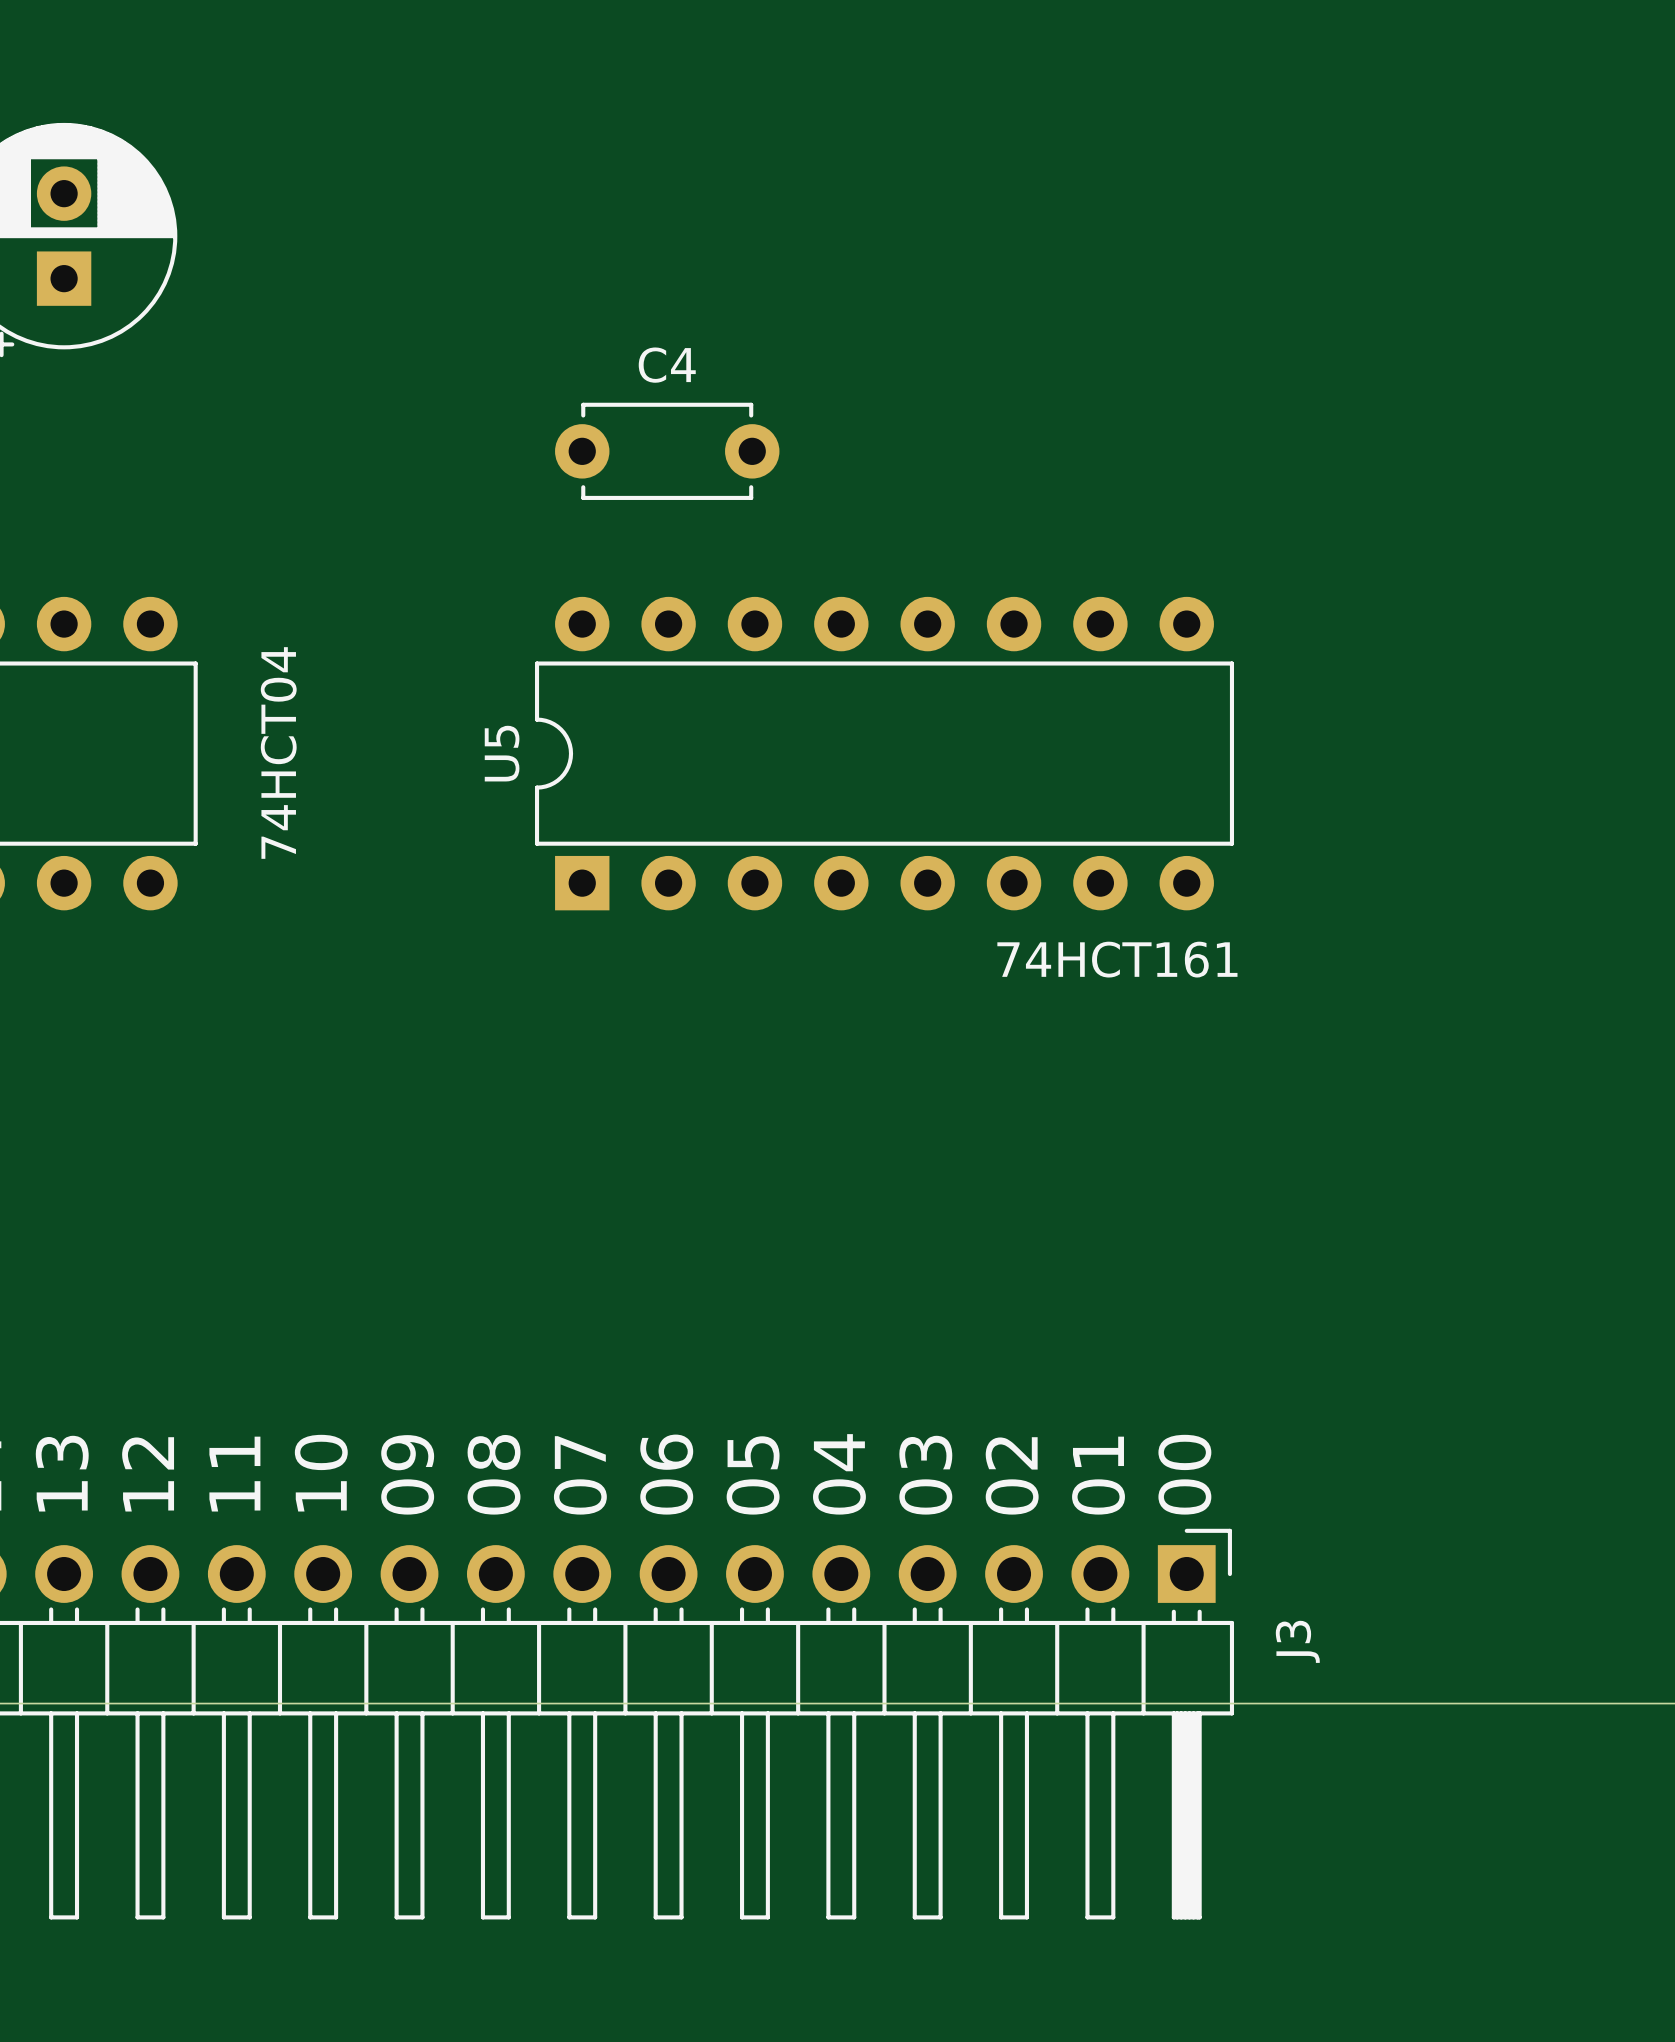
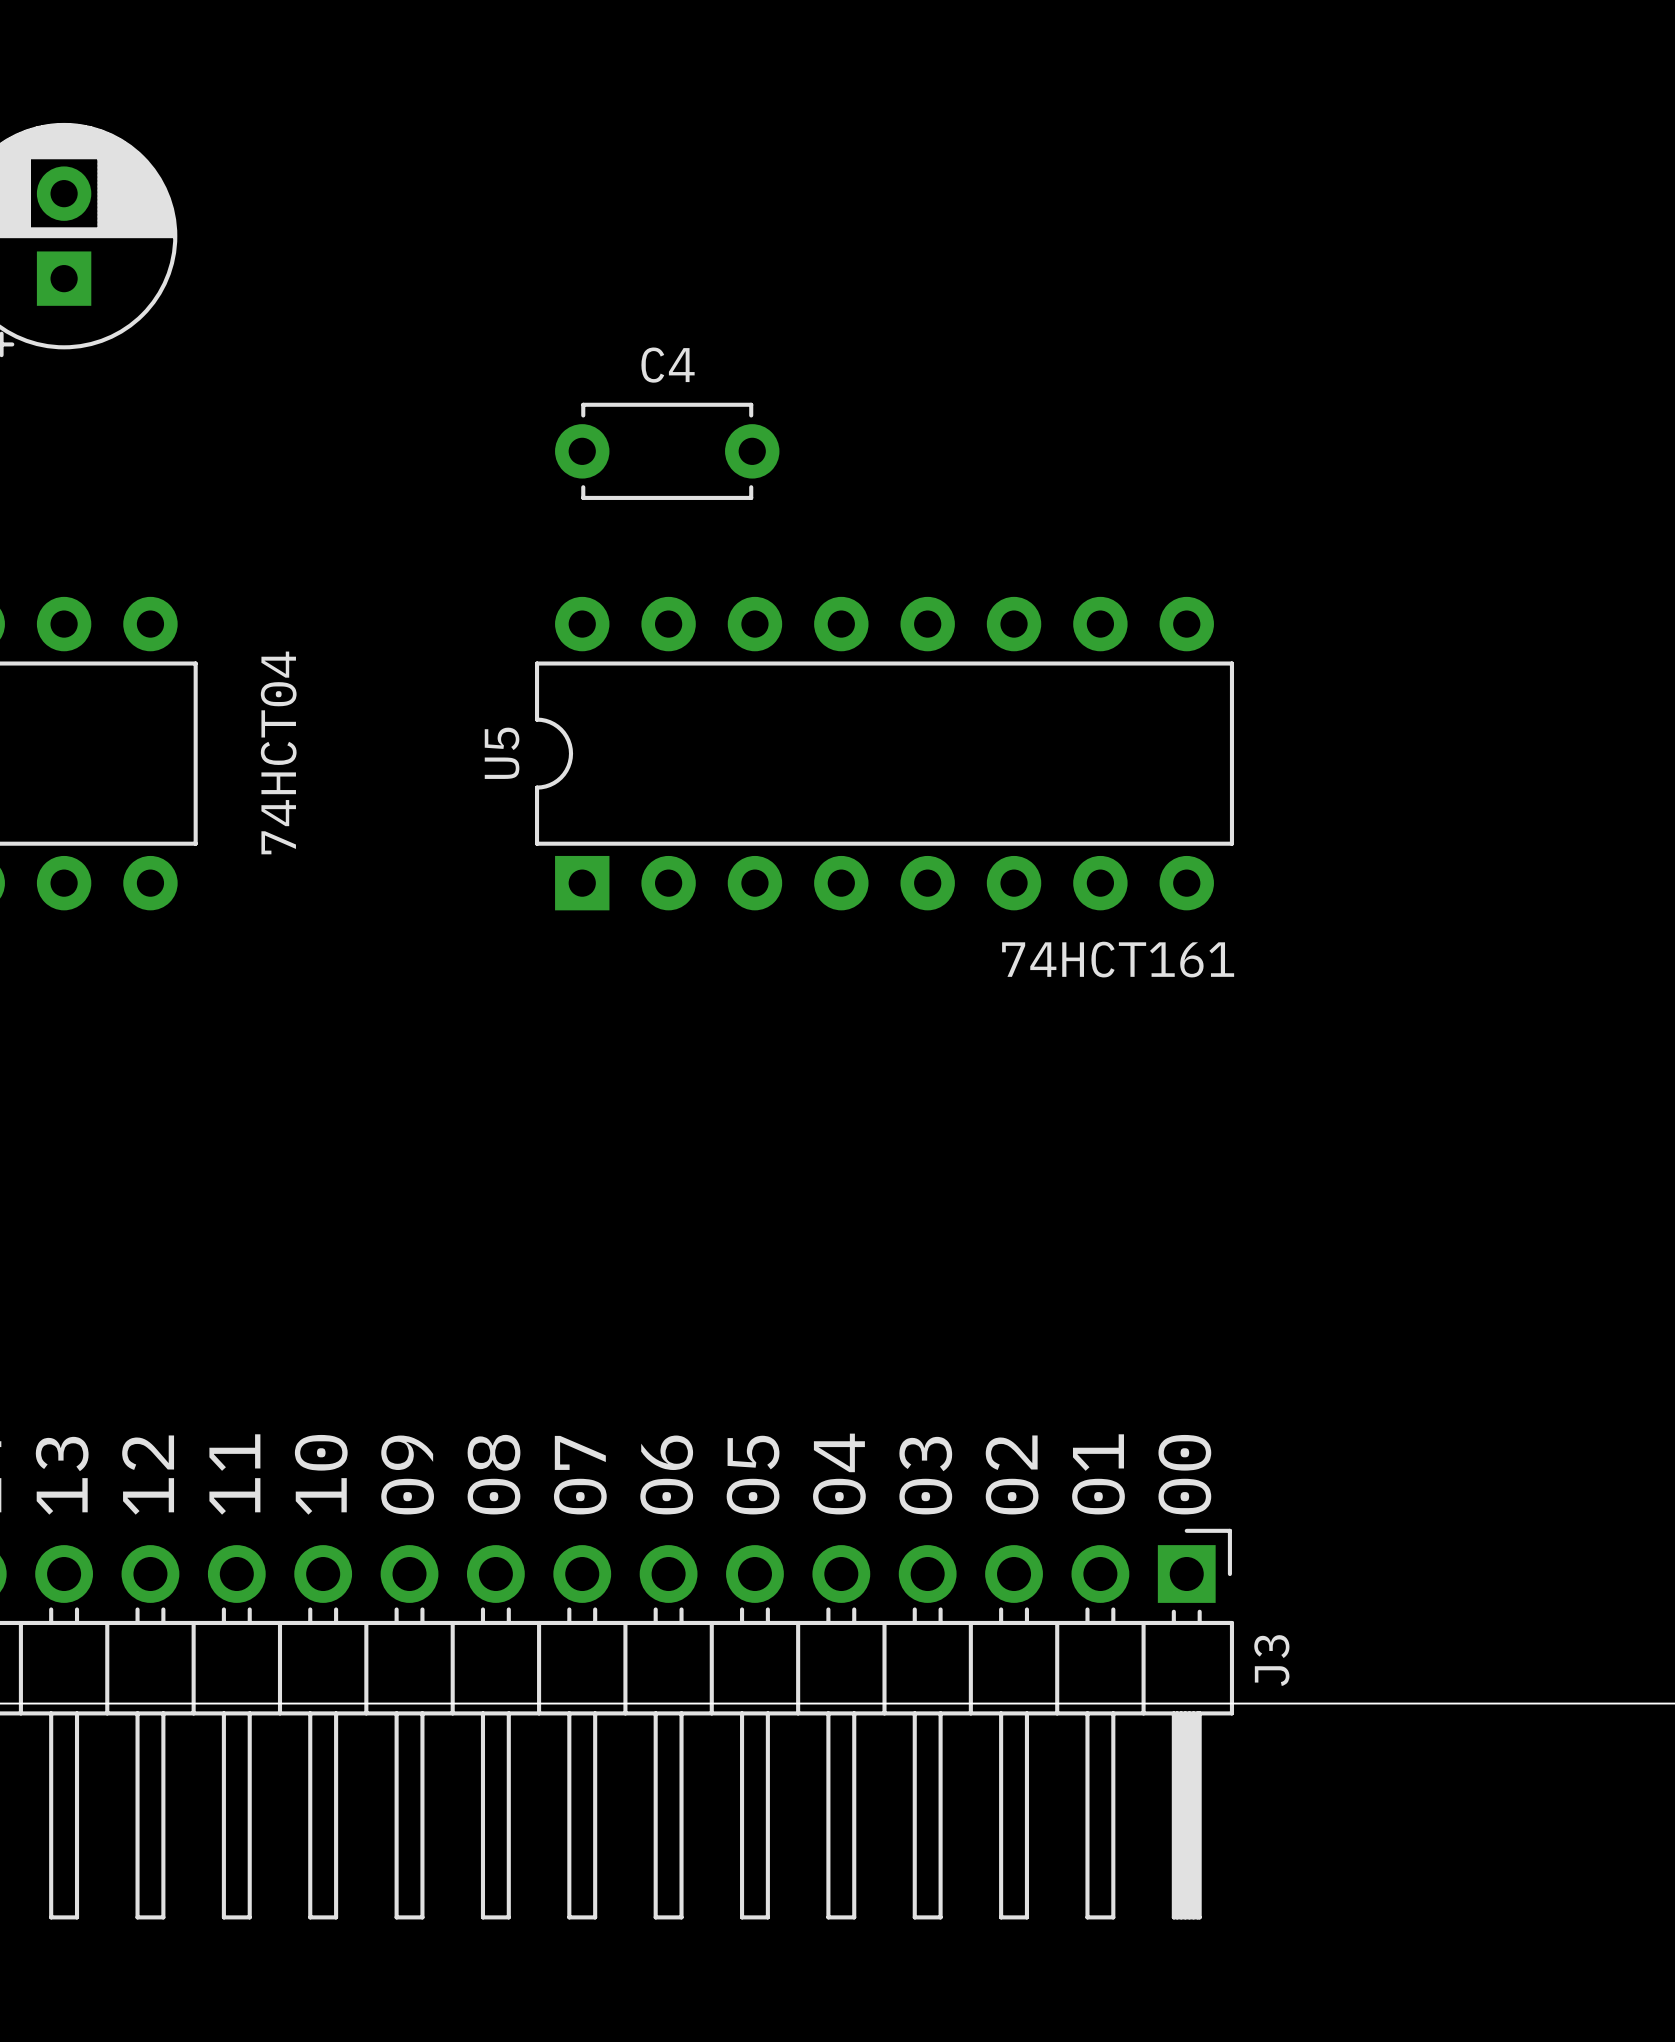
J3 name position: J3 (1297, 1641) -> J3 (1271, 1660)

